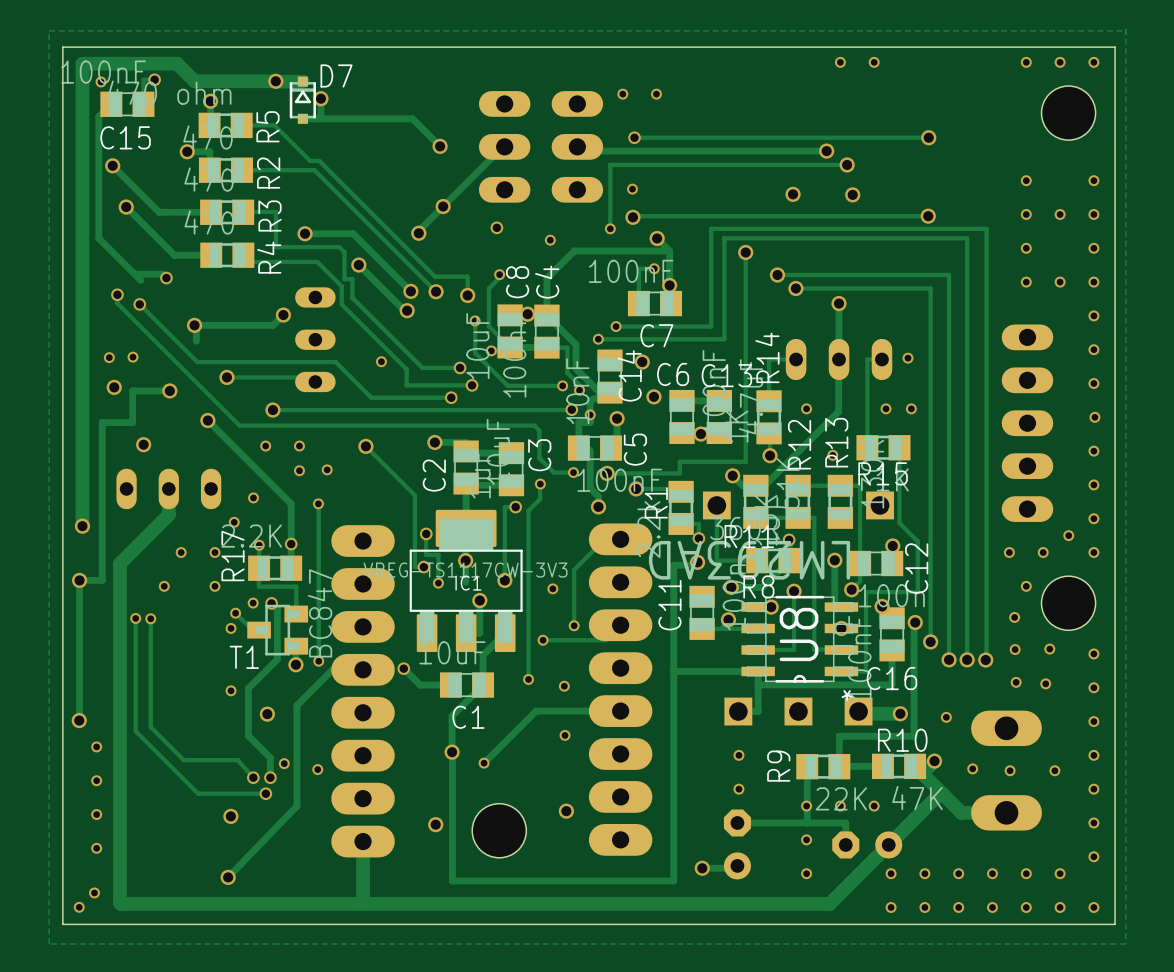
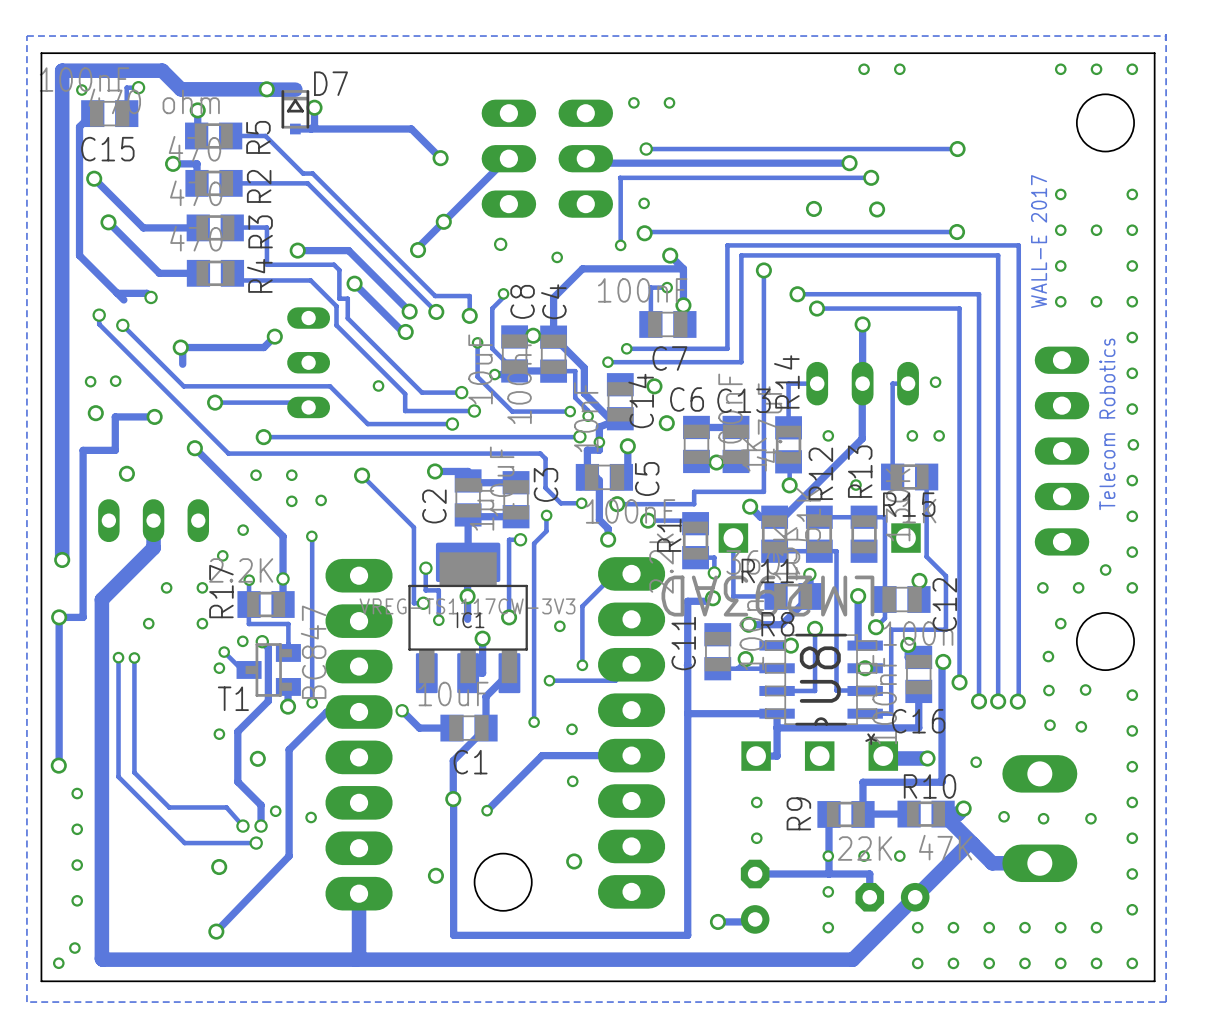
text: none -> WALL-E 2017 (1039, 241)
text: none -> Telecom Robotics (1107, 424)

